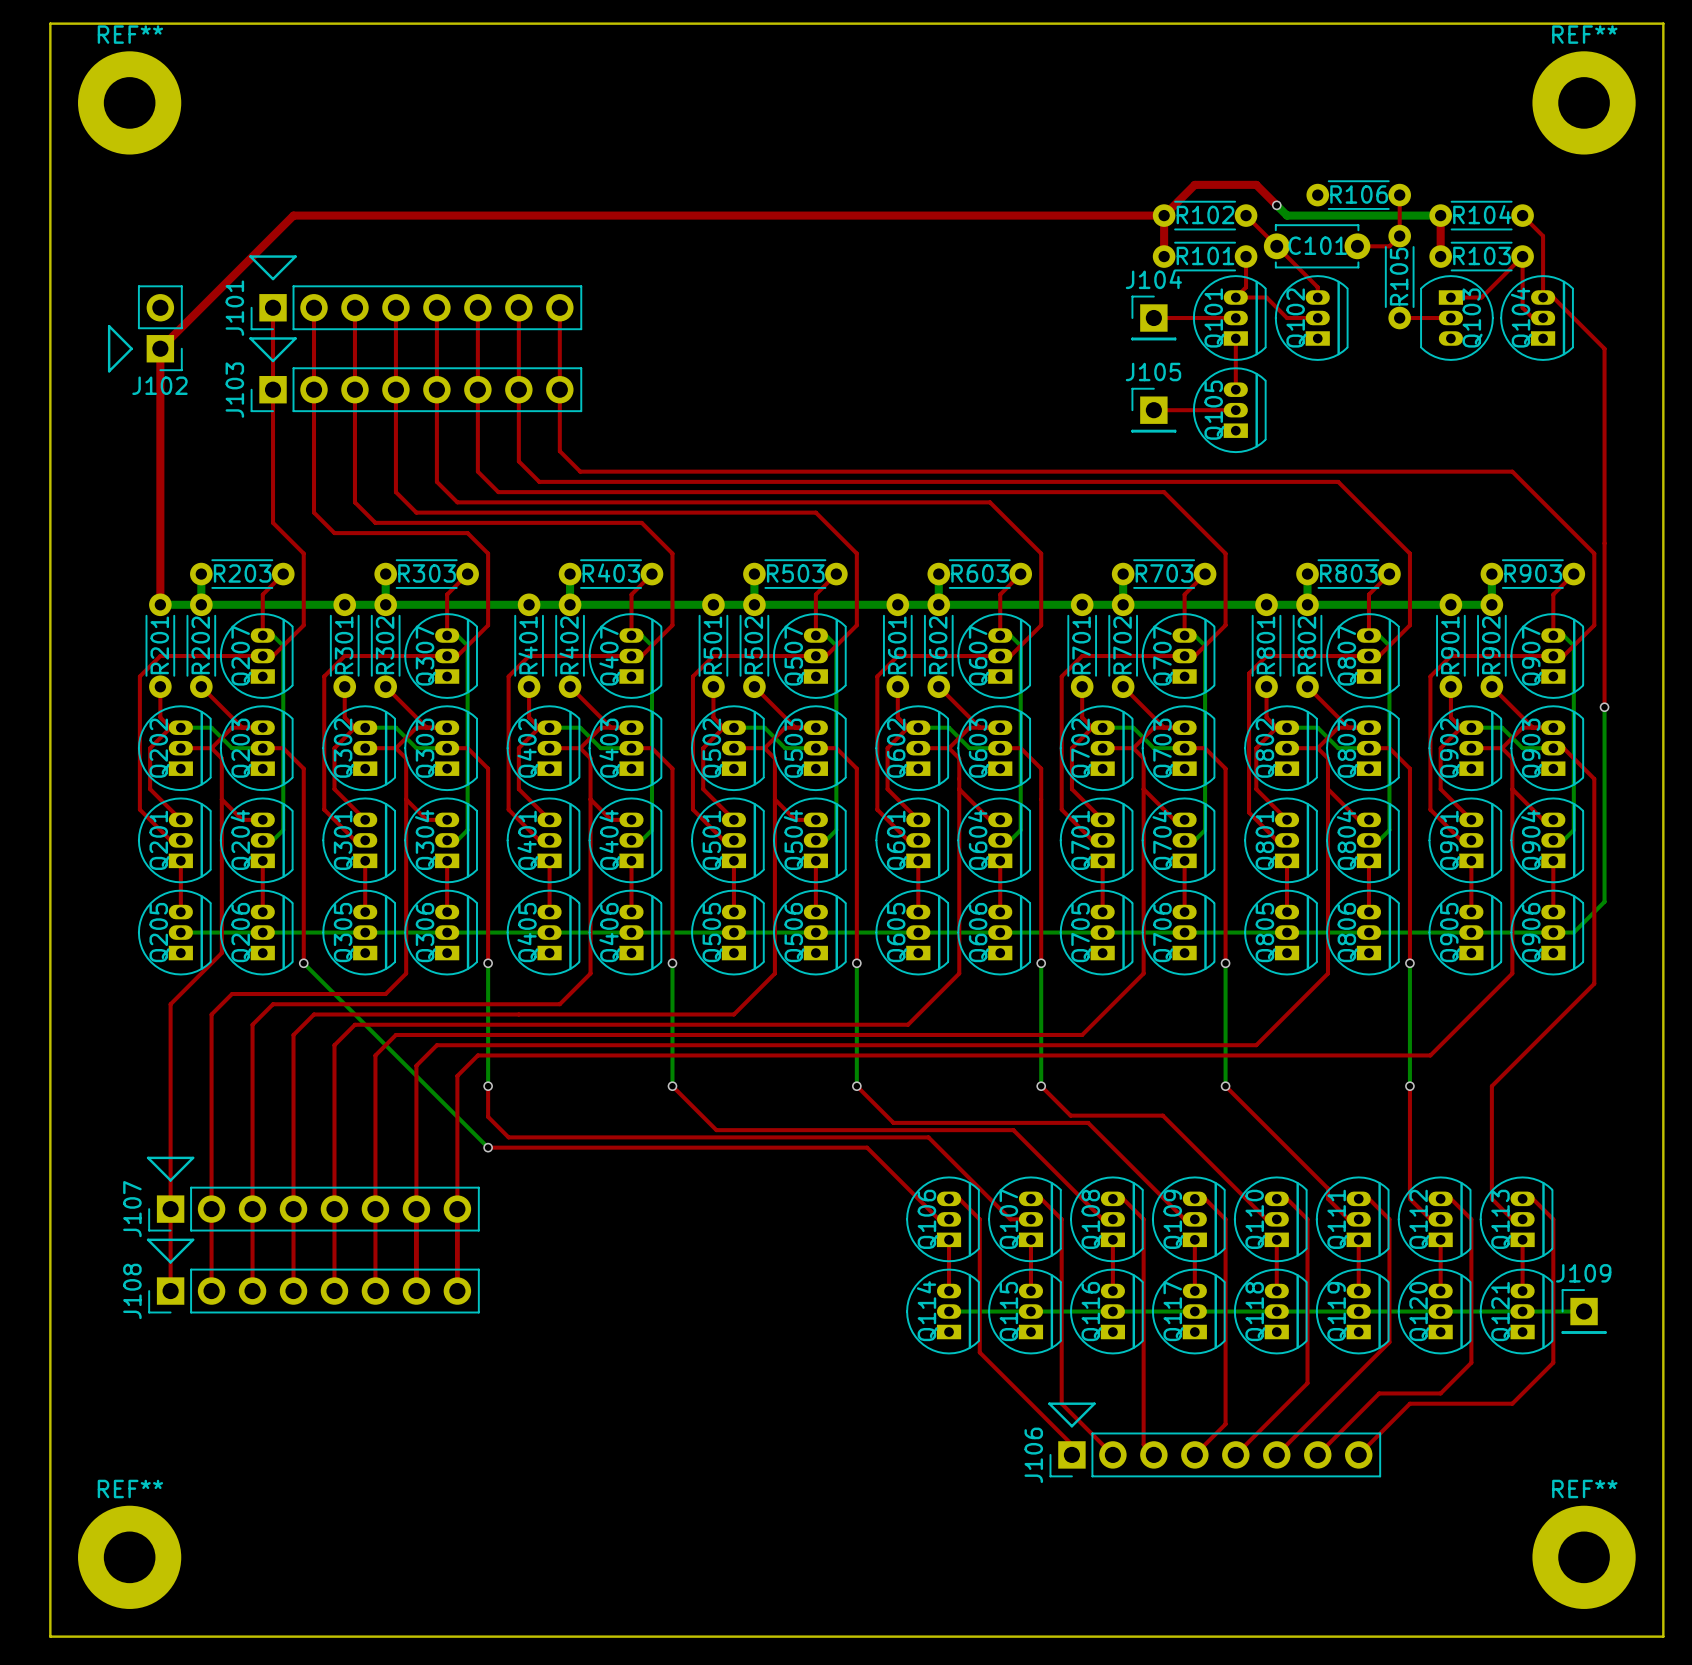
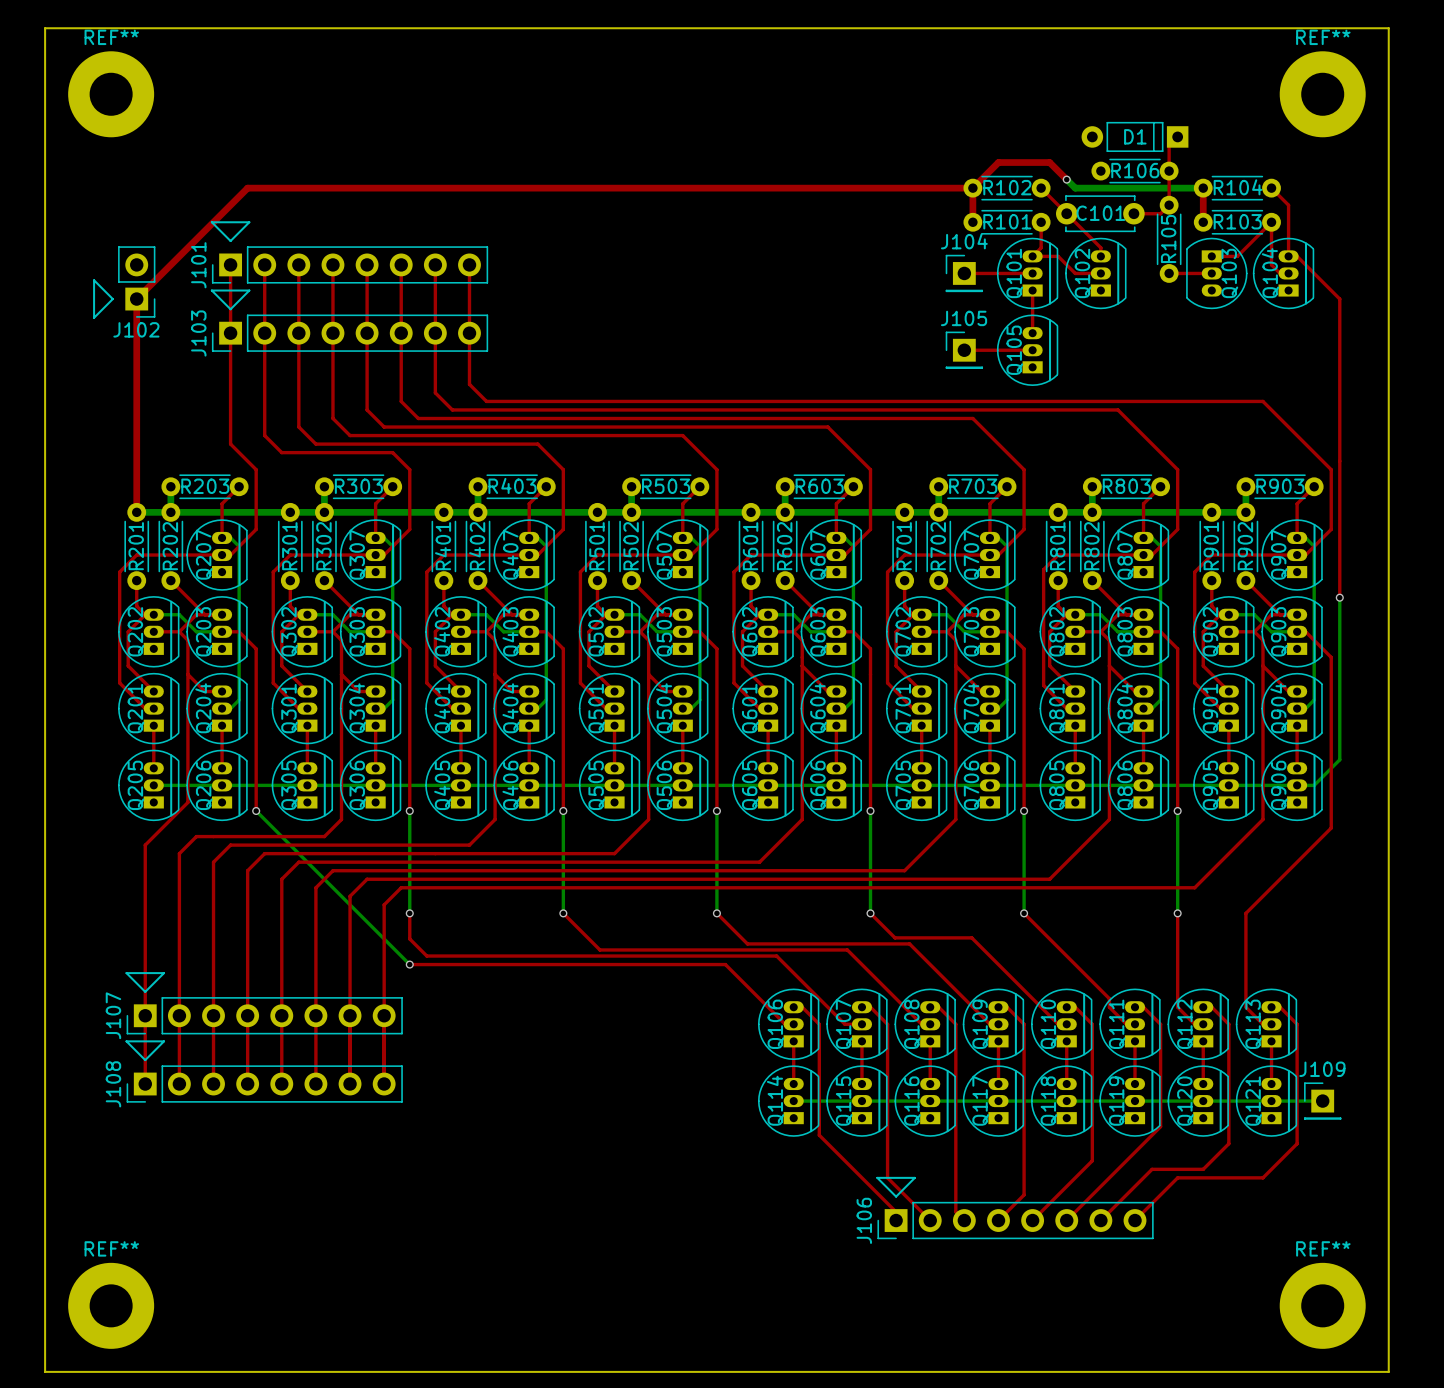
D1: none -> (1135, 136)
top track: none -> (1177, 136) (1169, 145) (1169, 171)

